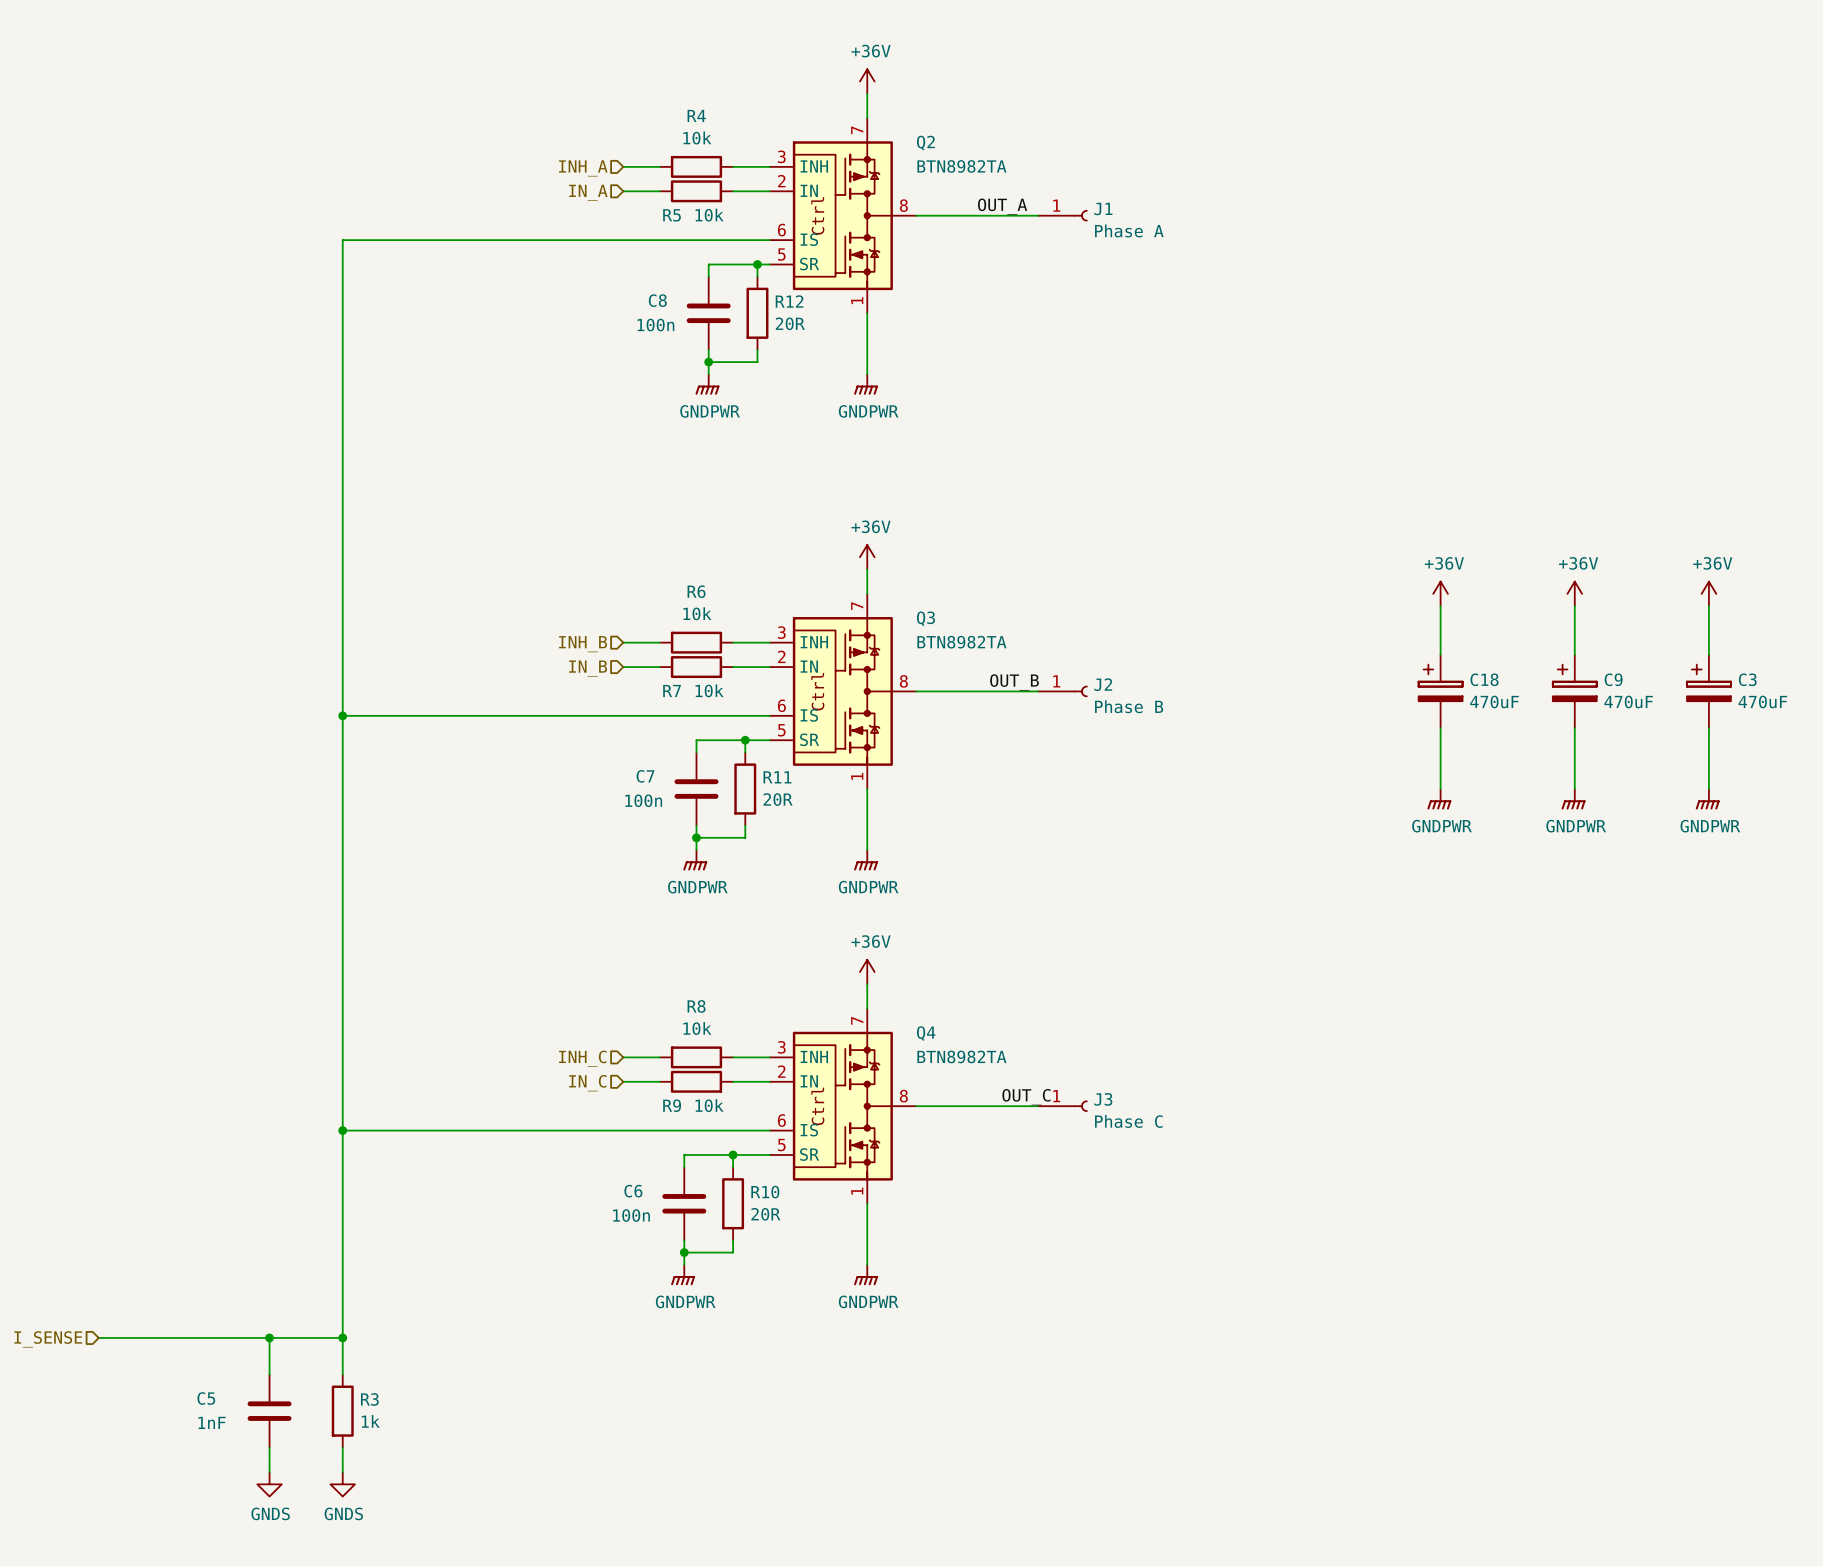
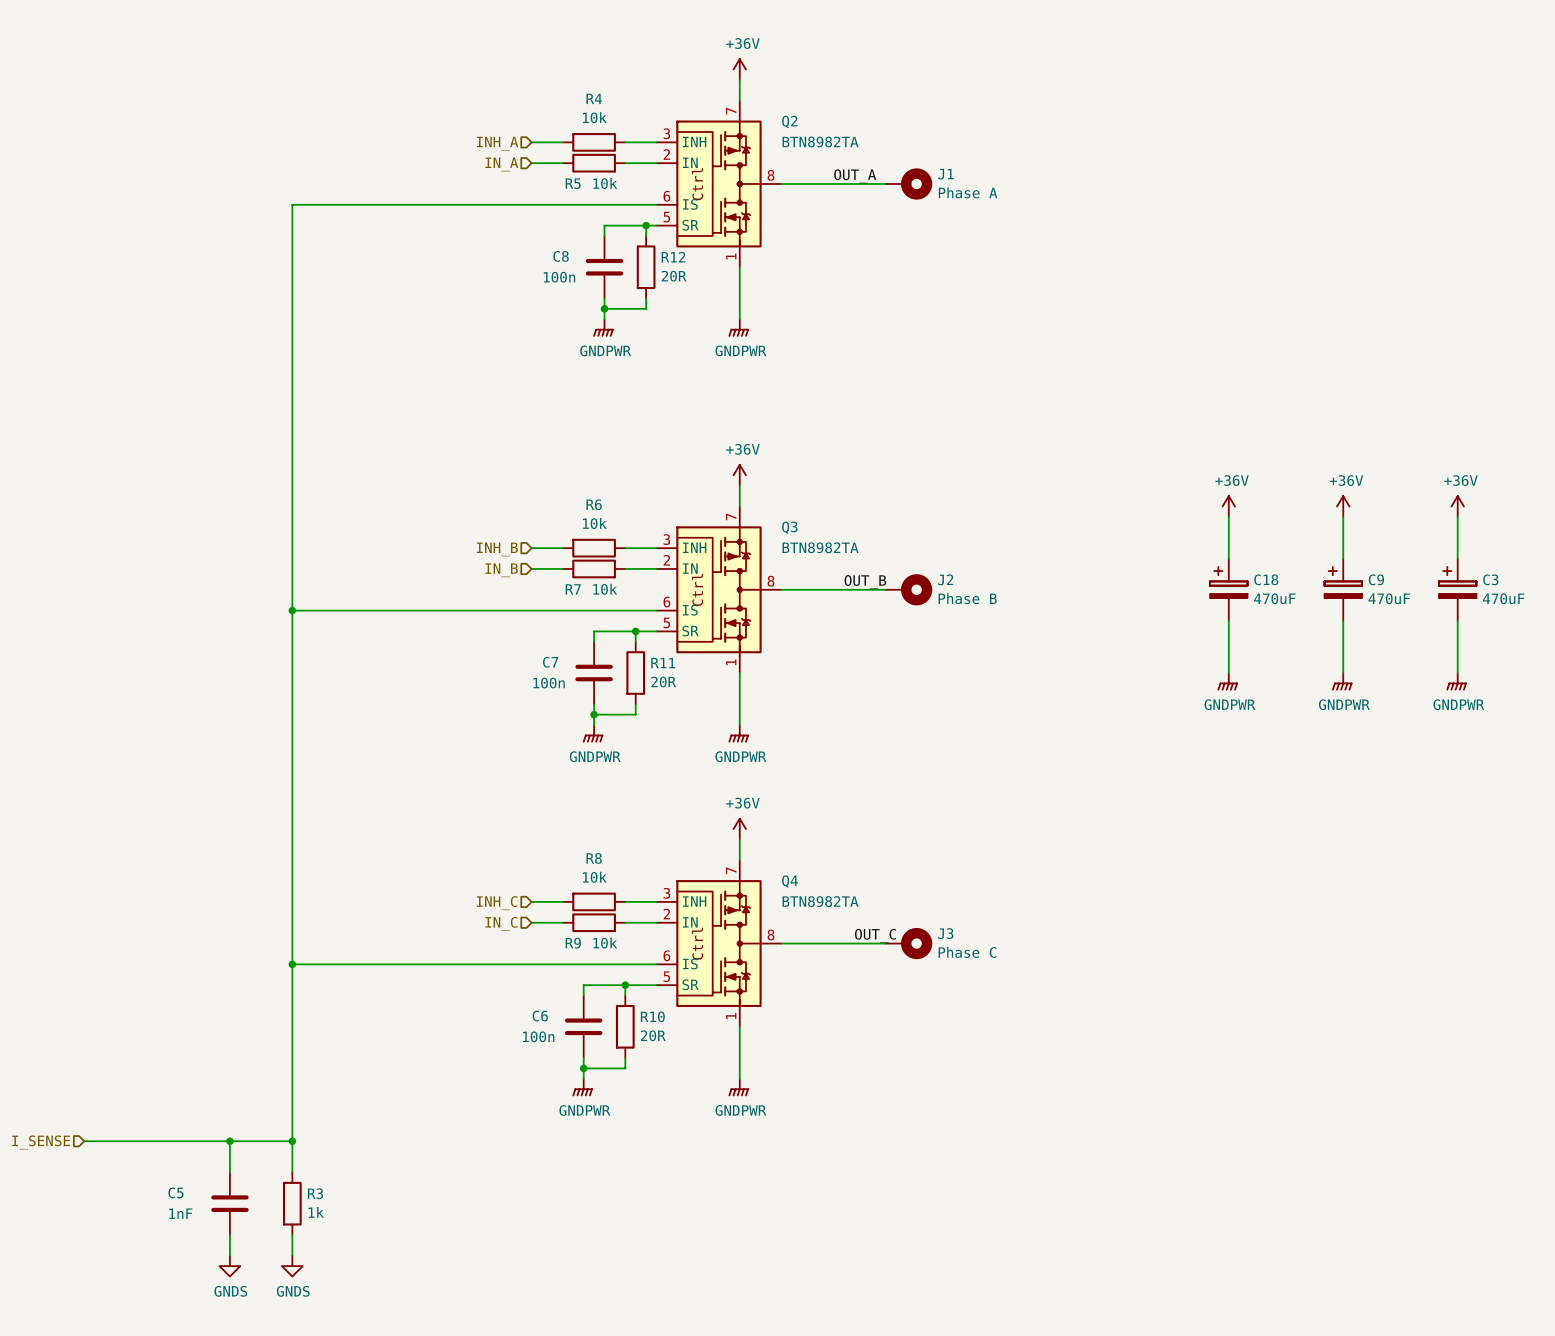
J1 symbol: [1038, 210, 1088, 222] -> [885, 168, 933, 200]
J2 symbol: [1038, 685, 1088, 698] -> [885, 574, 933, 606]
J3 symbol: [1038, 1100, 1088, 1112] -> [885, 927, 933, 960]

